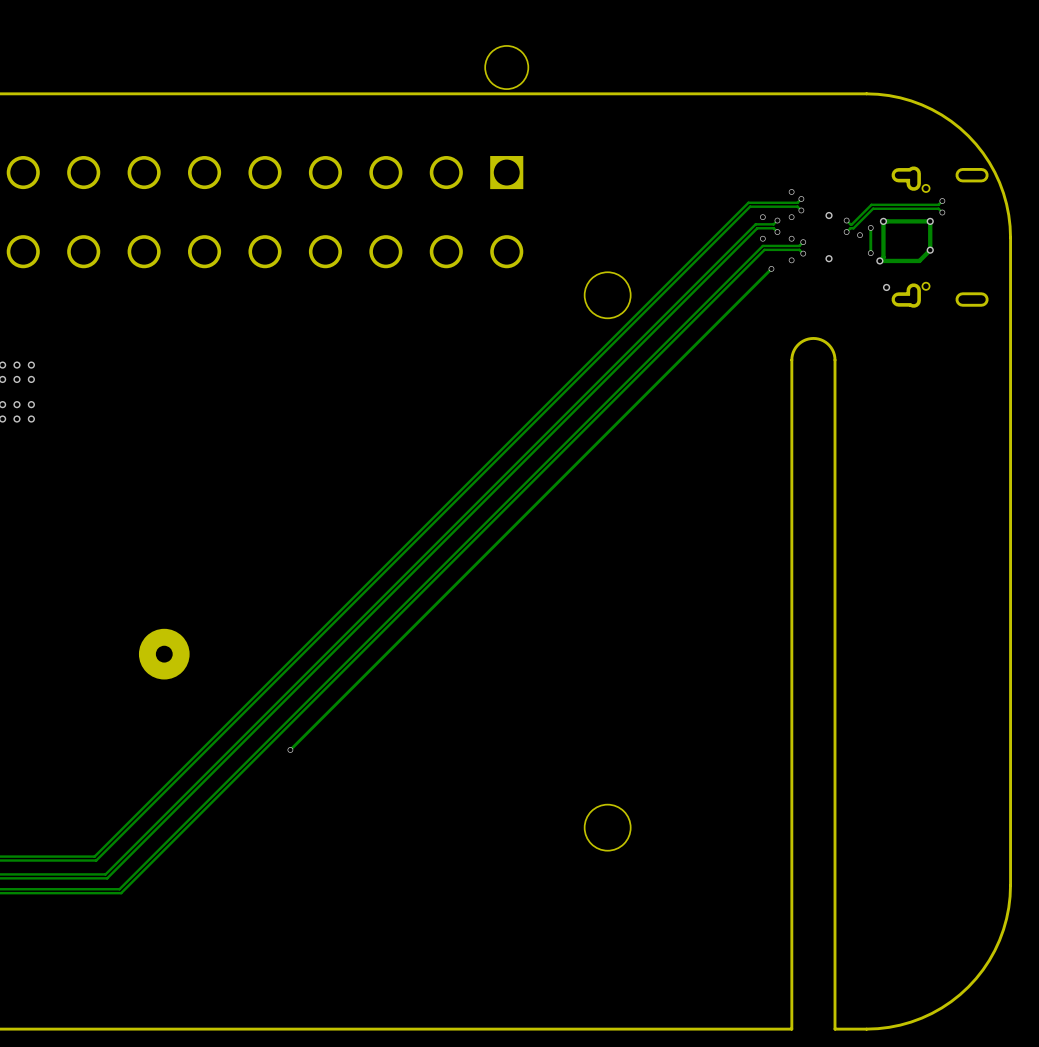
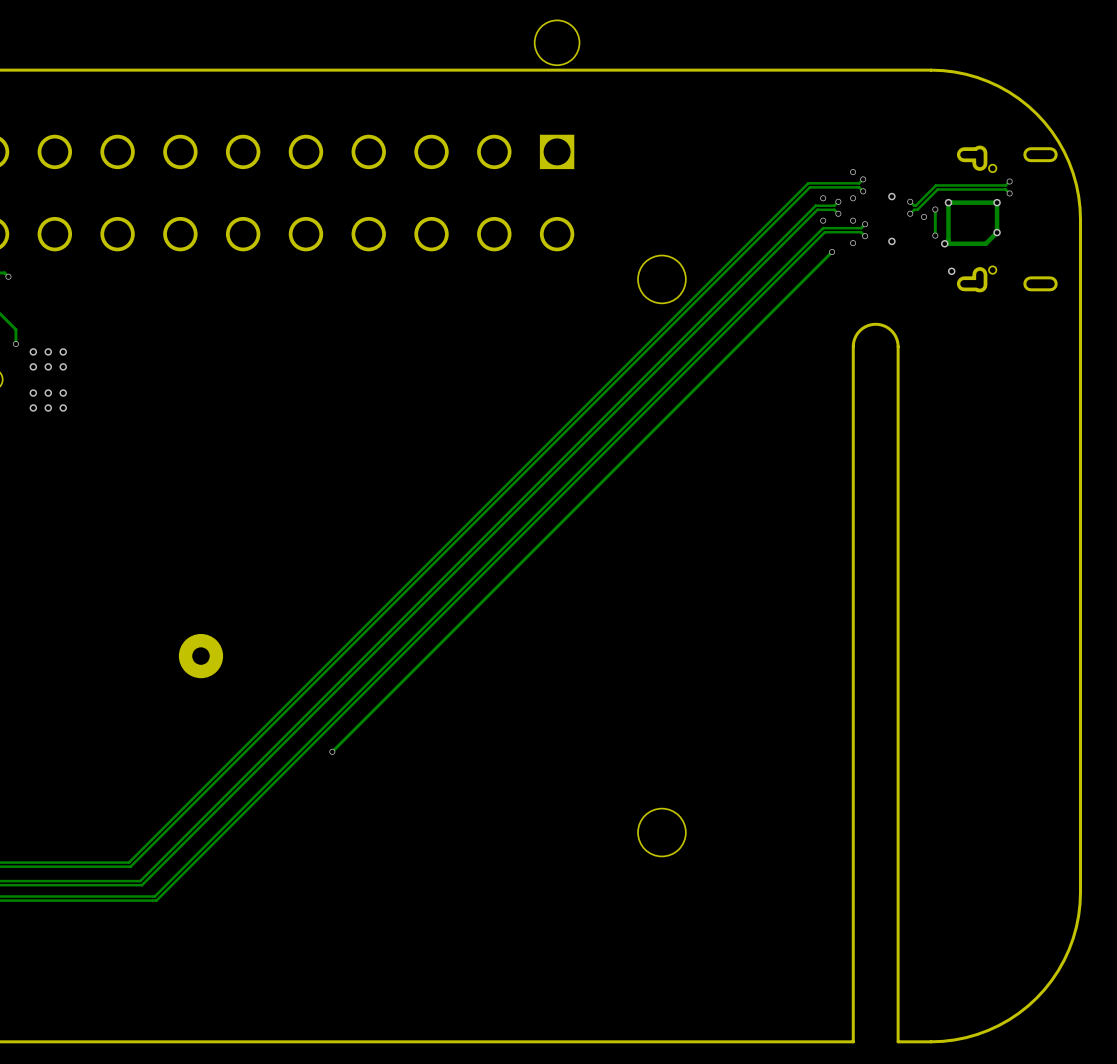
part footprint: [138, 628, 190, 680] -> [178, 633, 224, 679]

